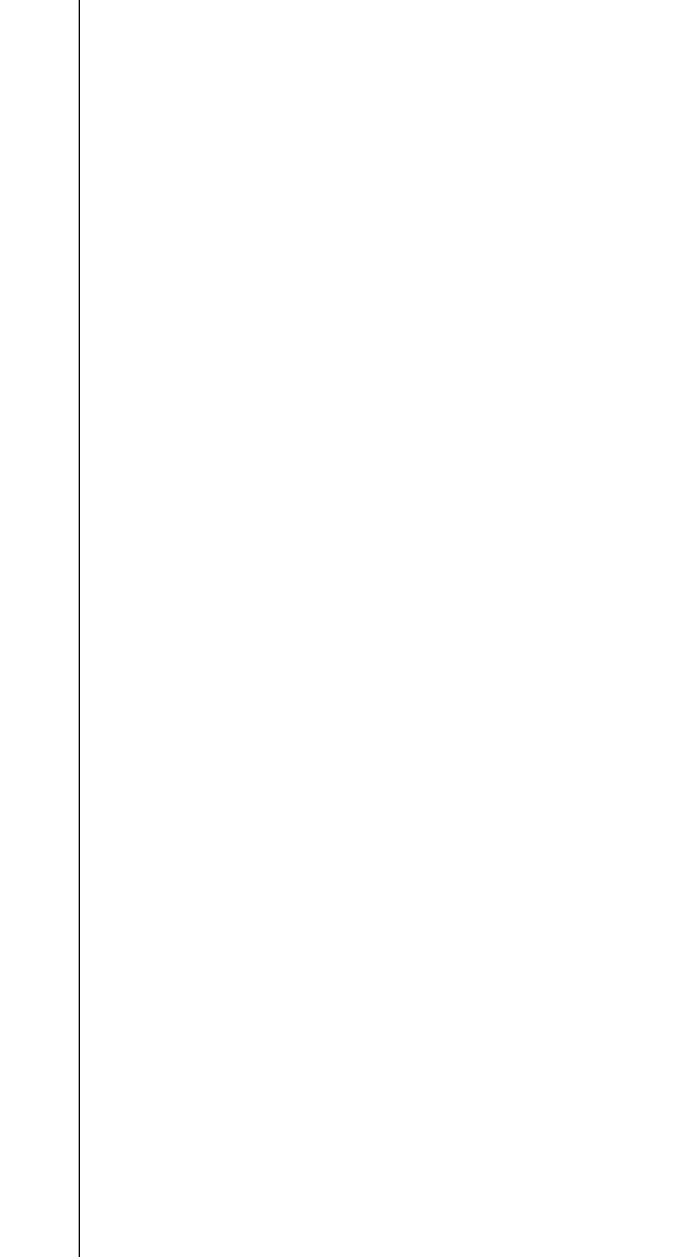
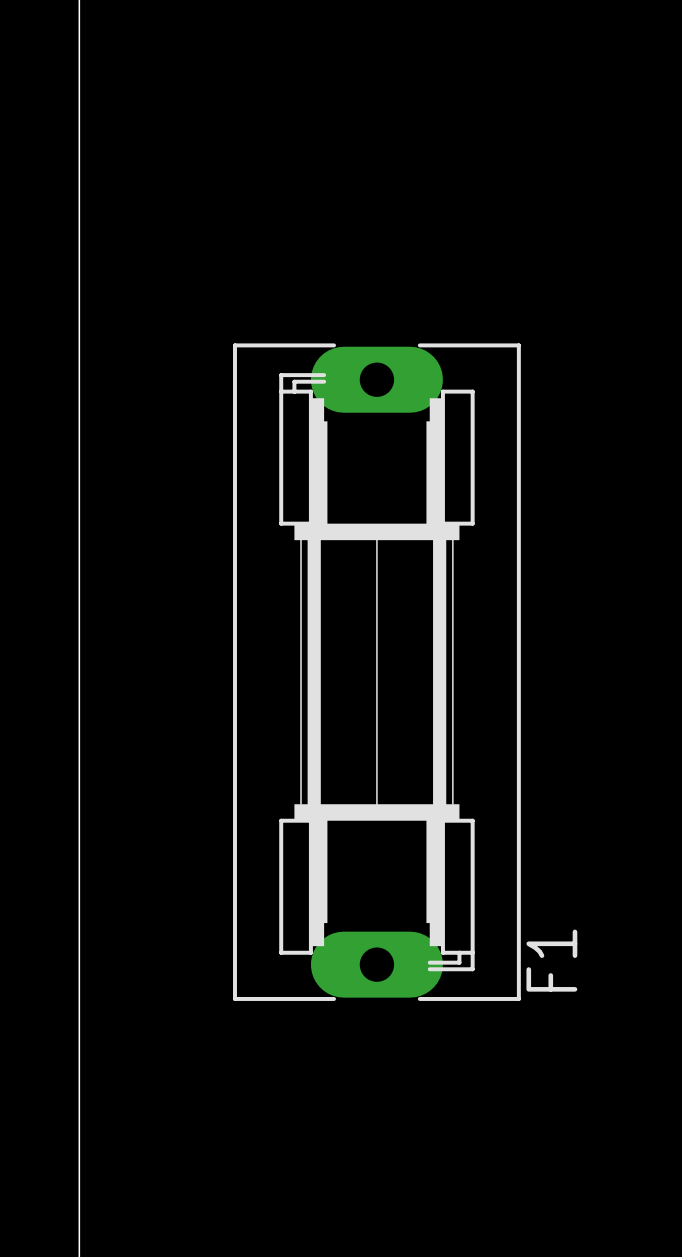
F1: none -> (376, 672)

